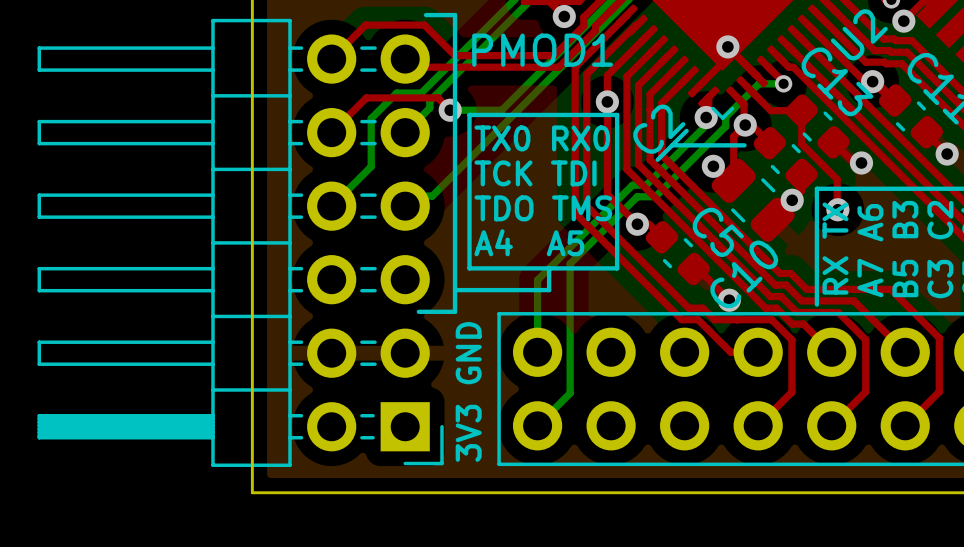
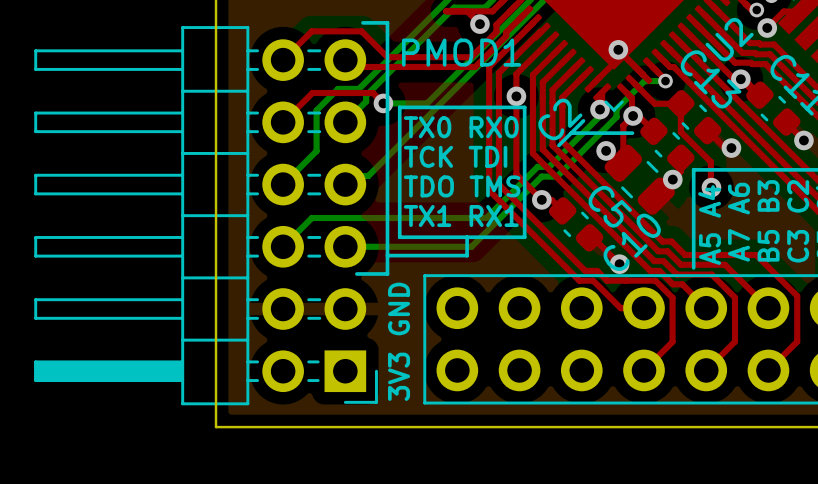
text: A4 A5 (529, 242) -> TX1 RX1 (461, 216)
bottom track: (571, 245) (537, 280) (537, 352) -> (486, 218) (311, 218) (283, 246)
text: RX TX (835, 248) -> none
text: none -> A5 A4 (709, 225)
bottom track: (570, 263) (570, 393) (537, 425) -> (484, 233) (471, 246) (345, 246)

